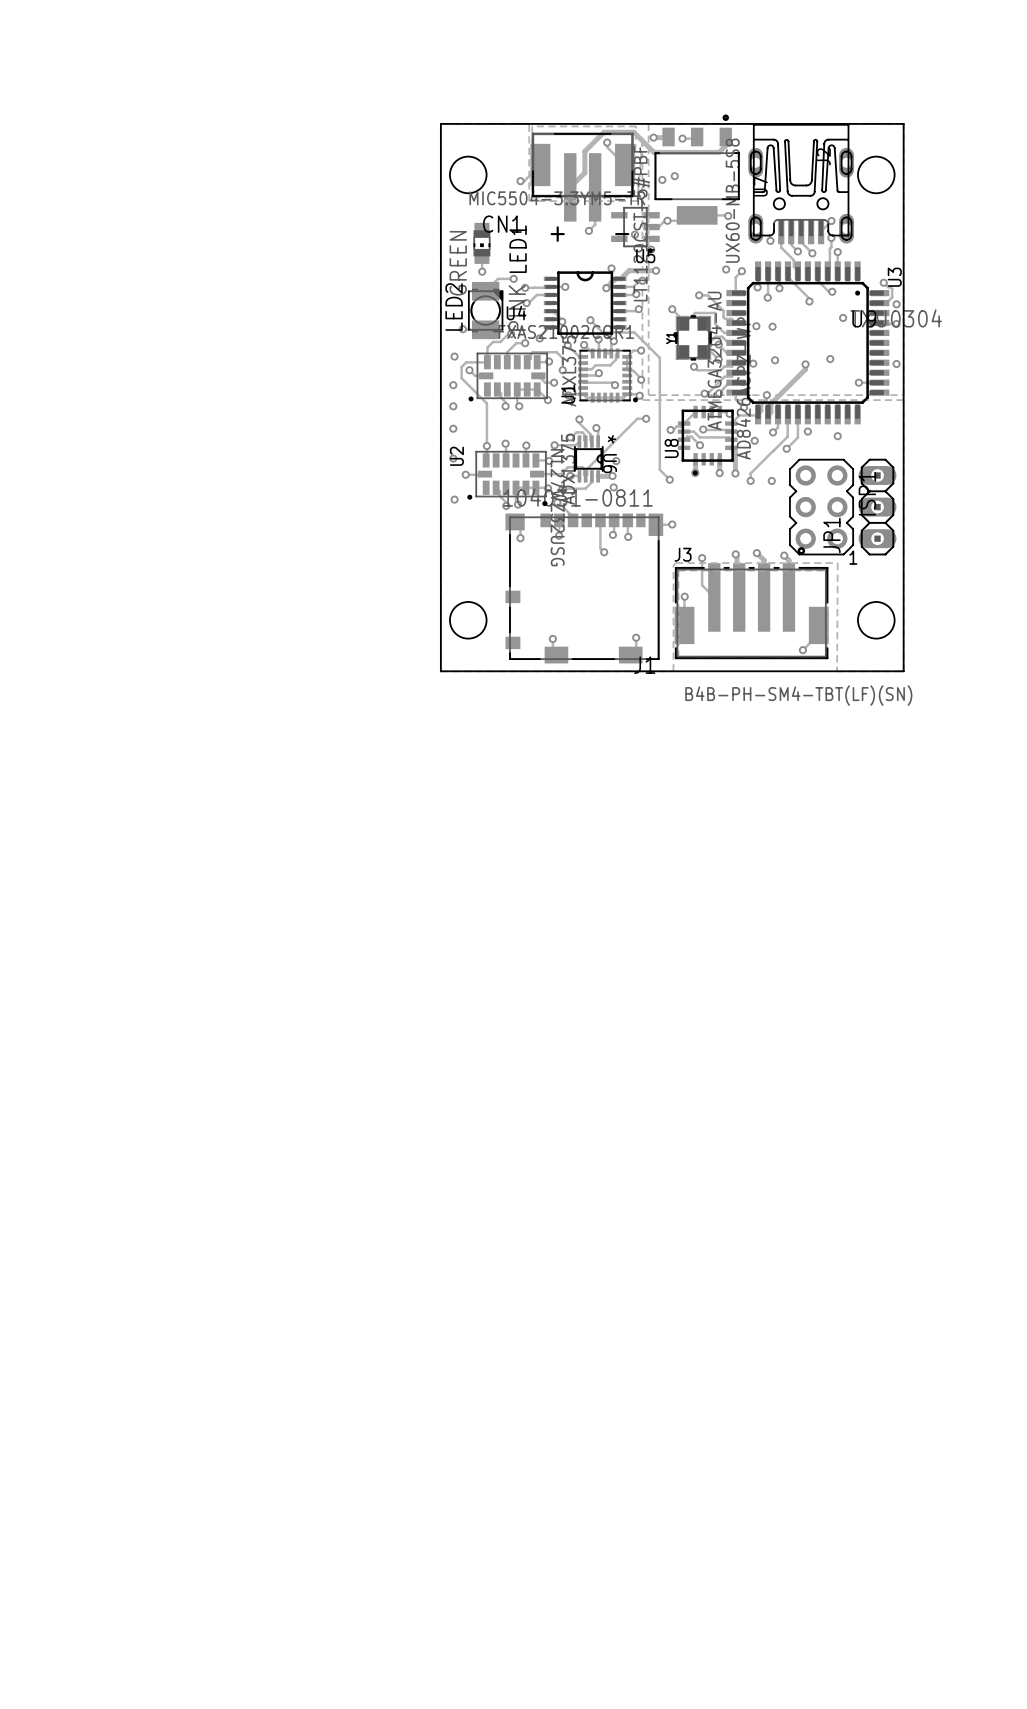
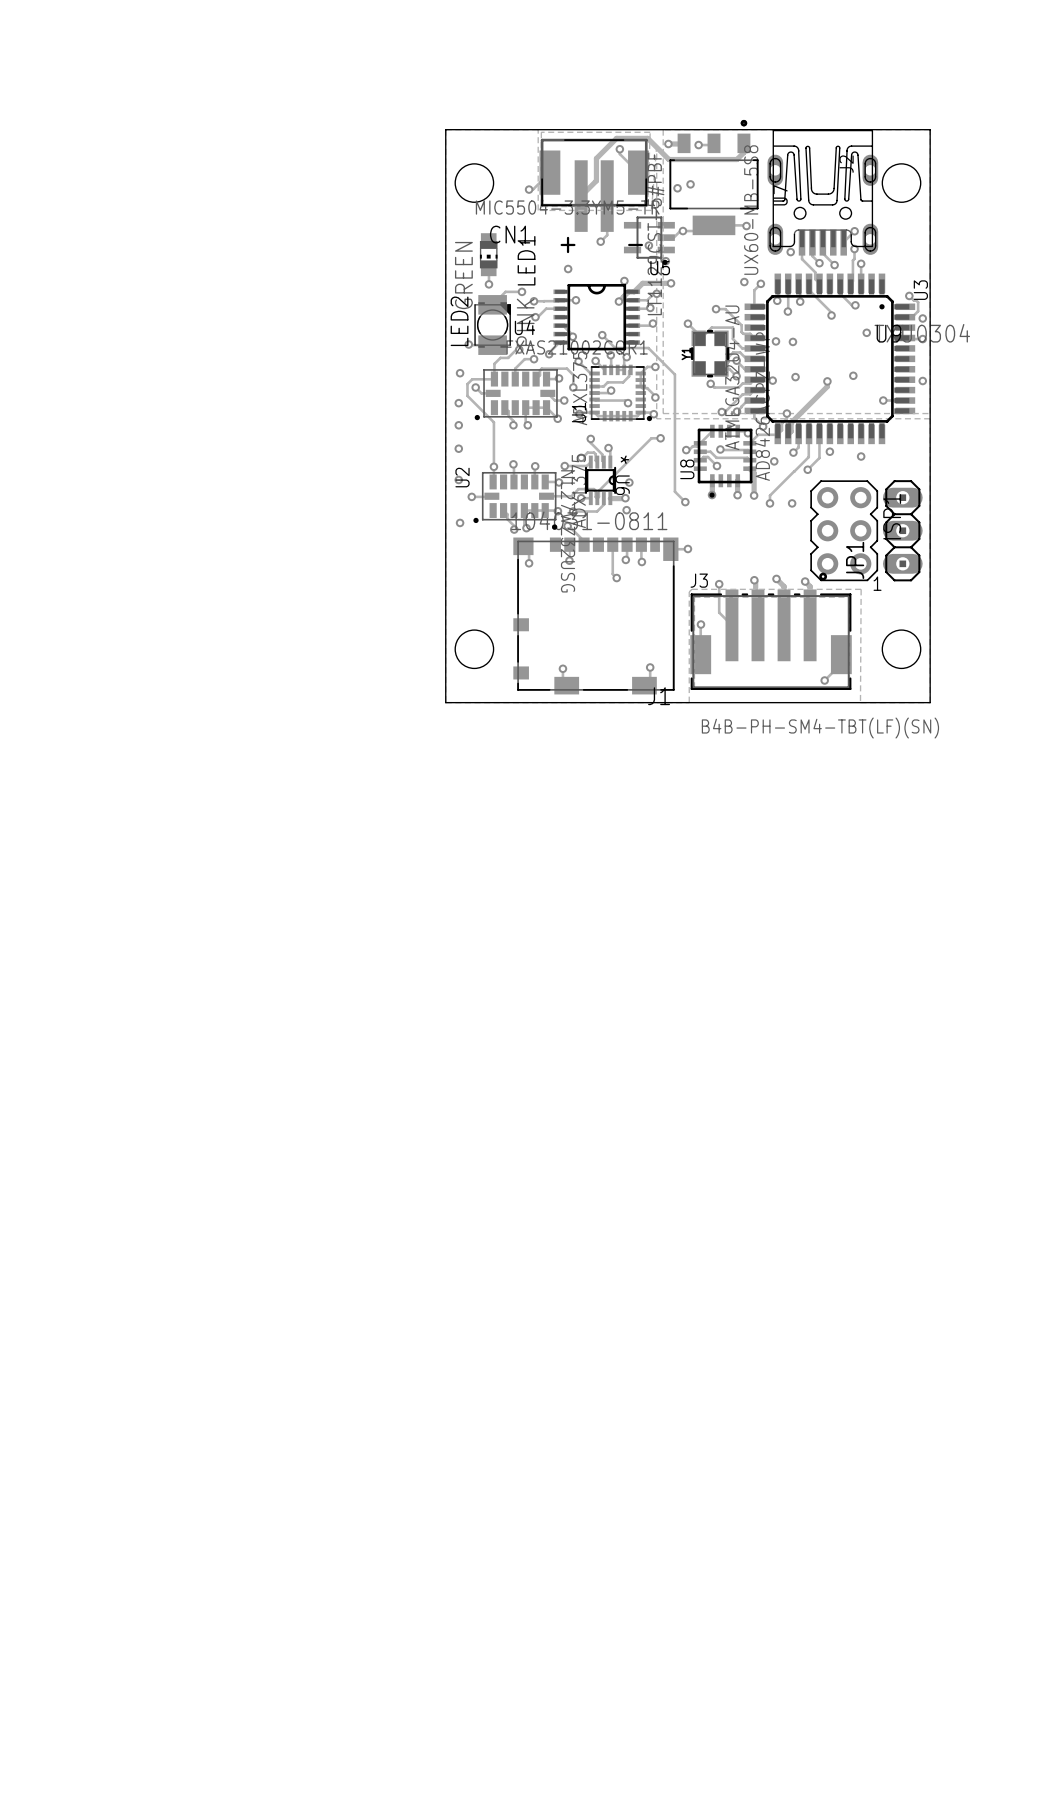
via: none -> (568, 269)

